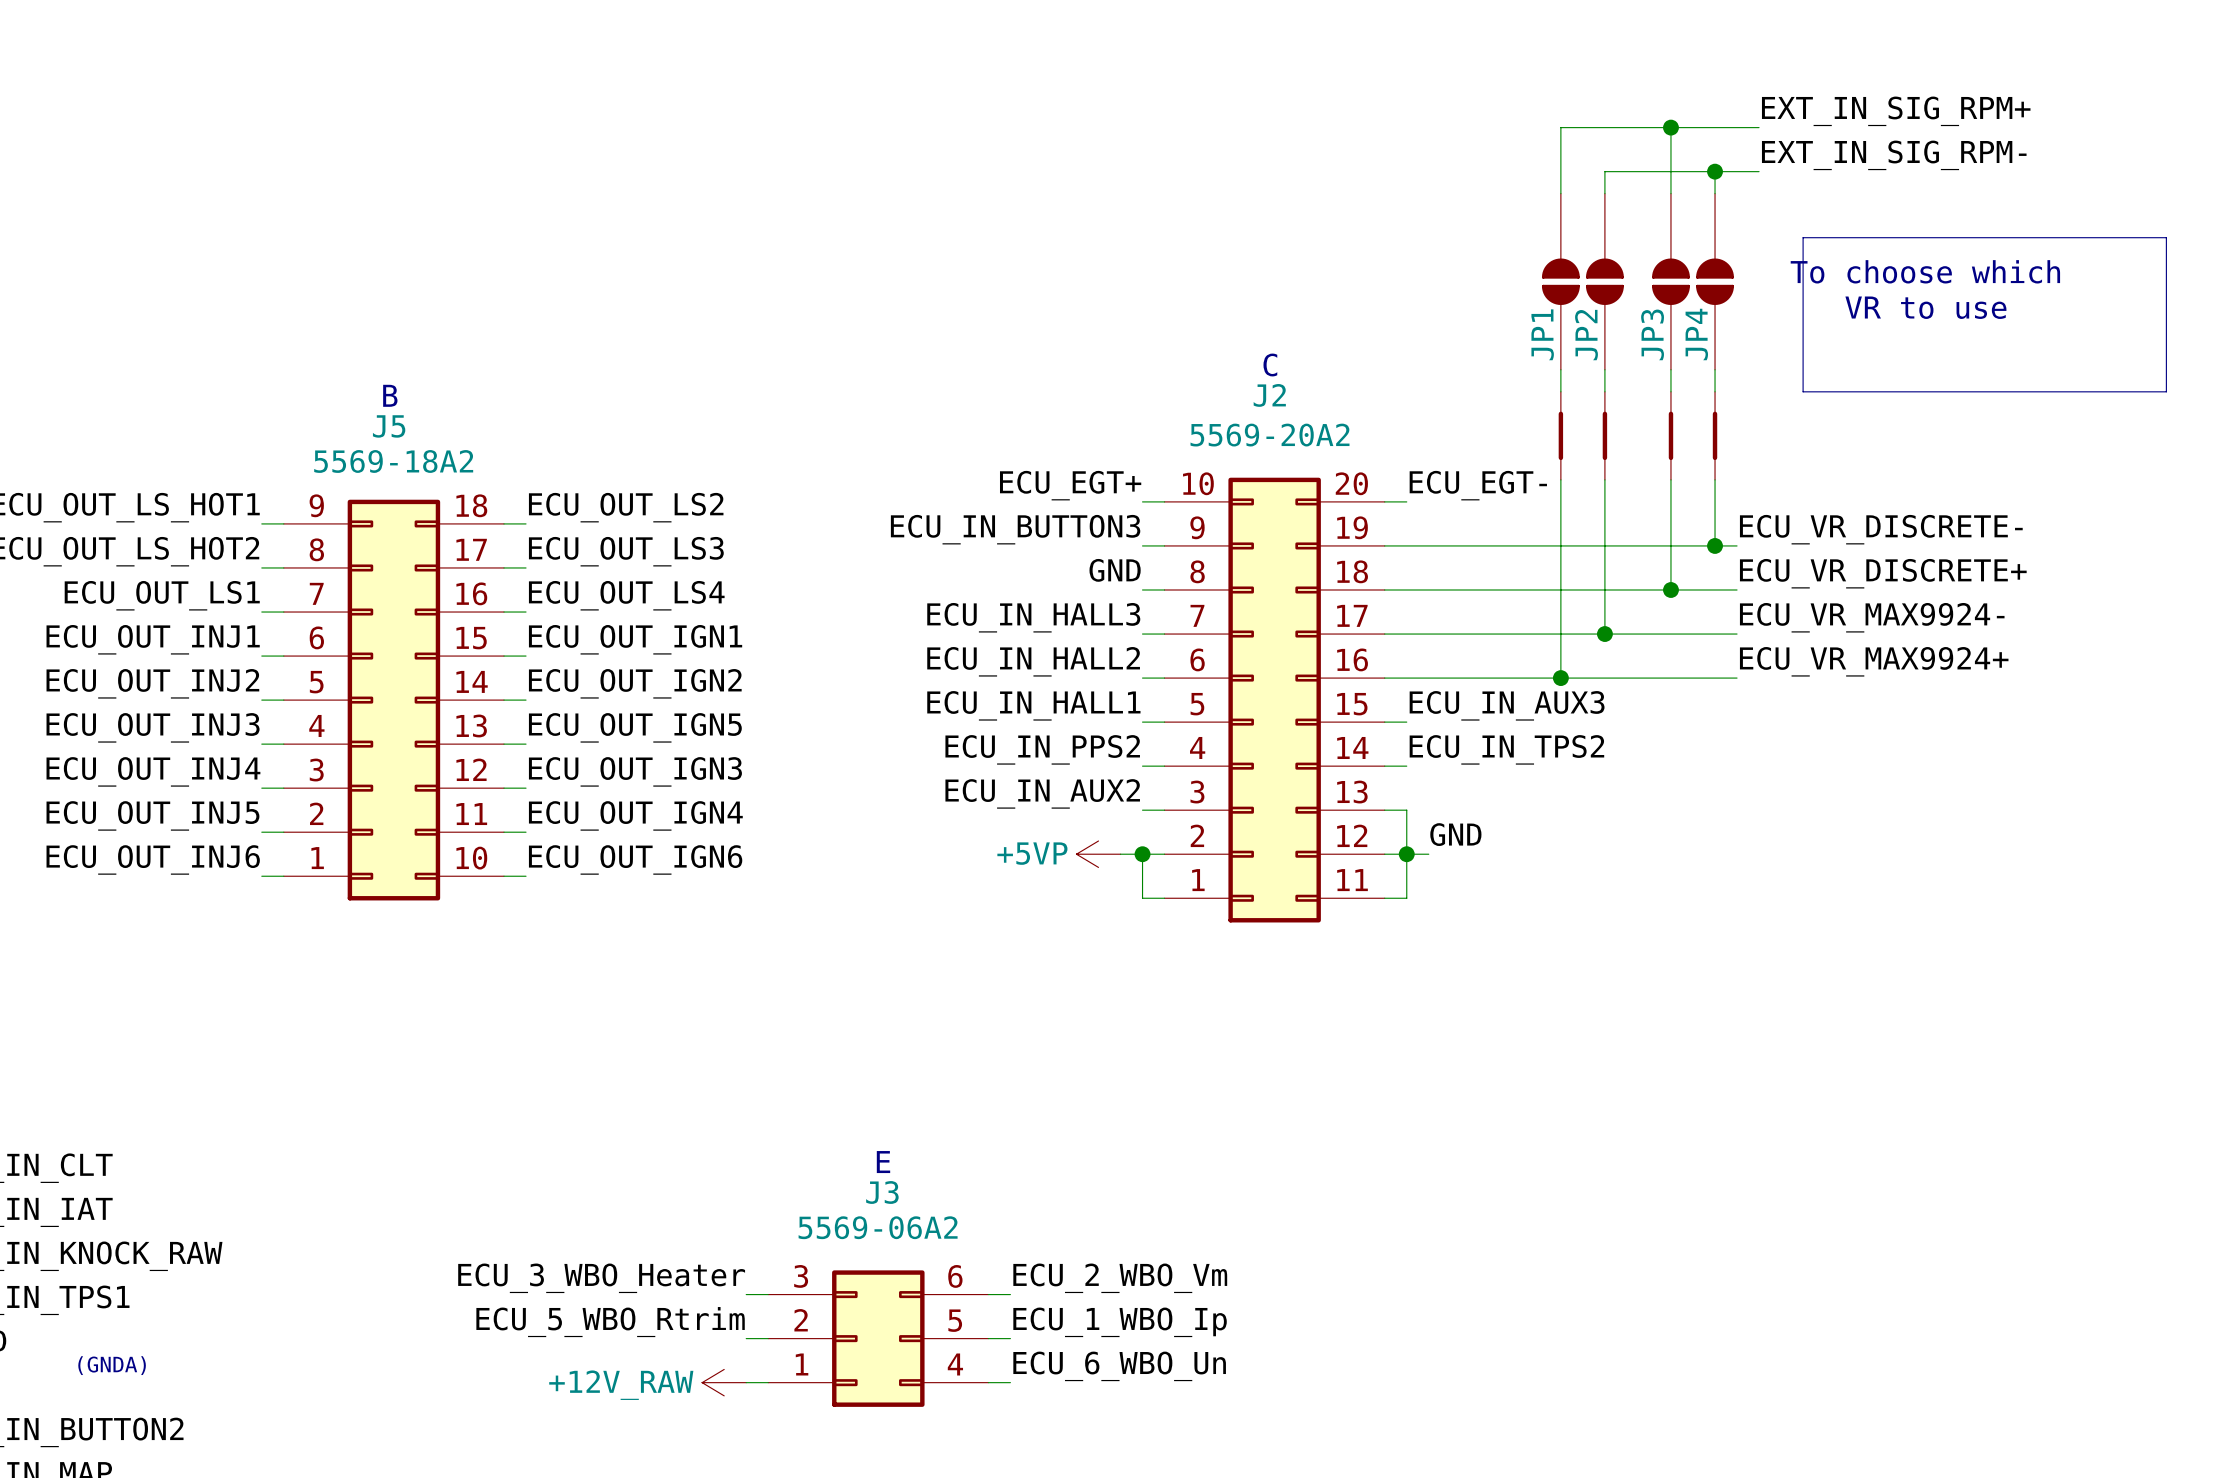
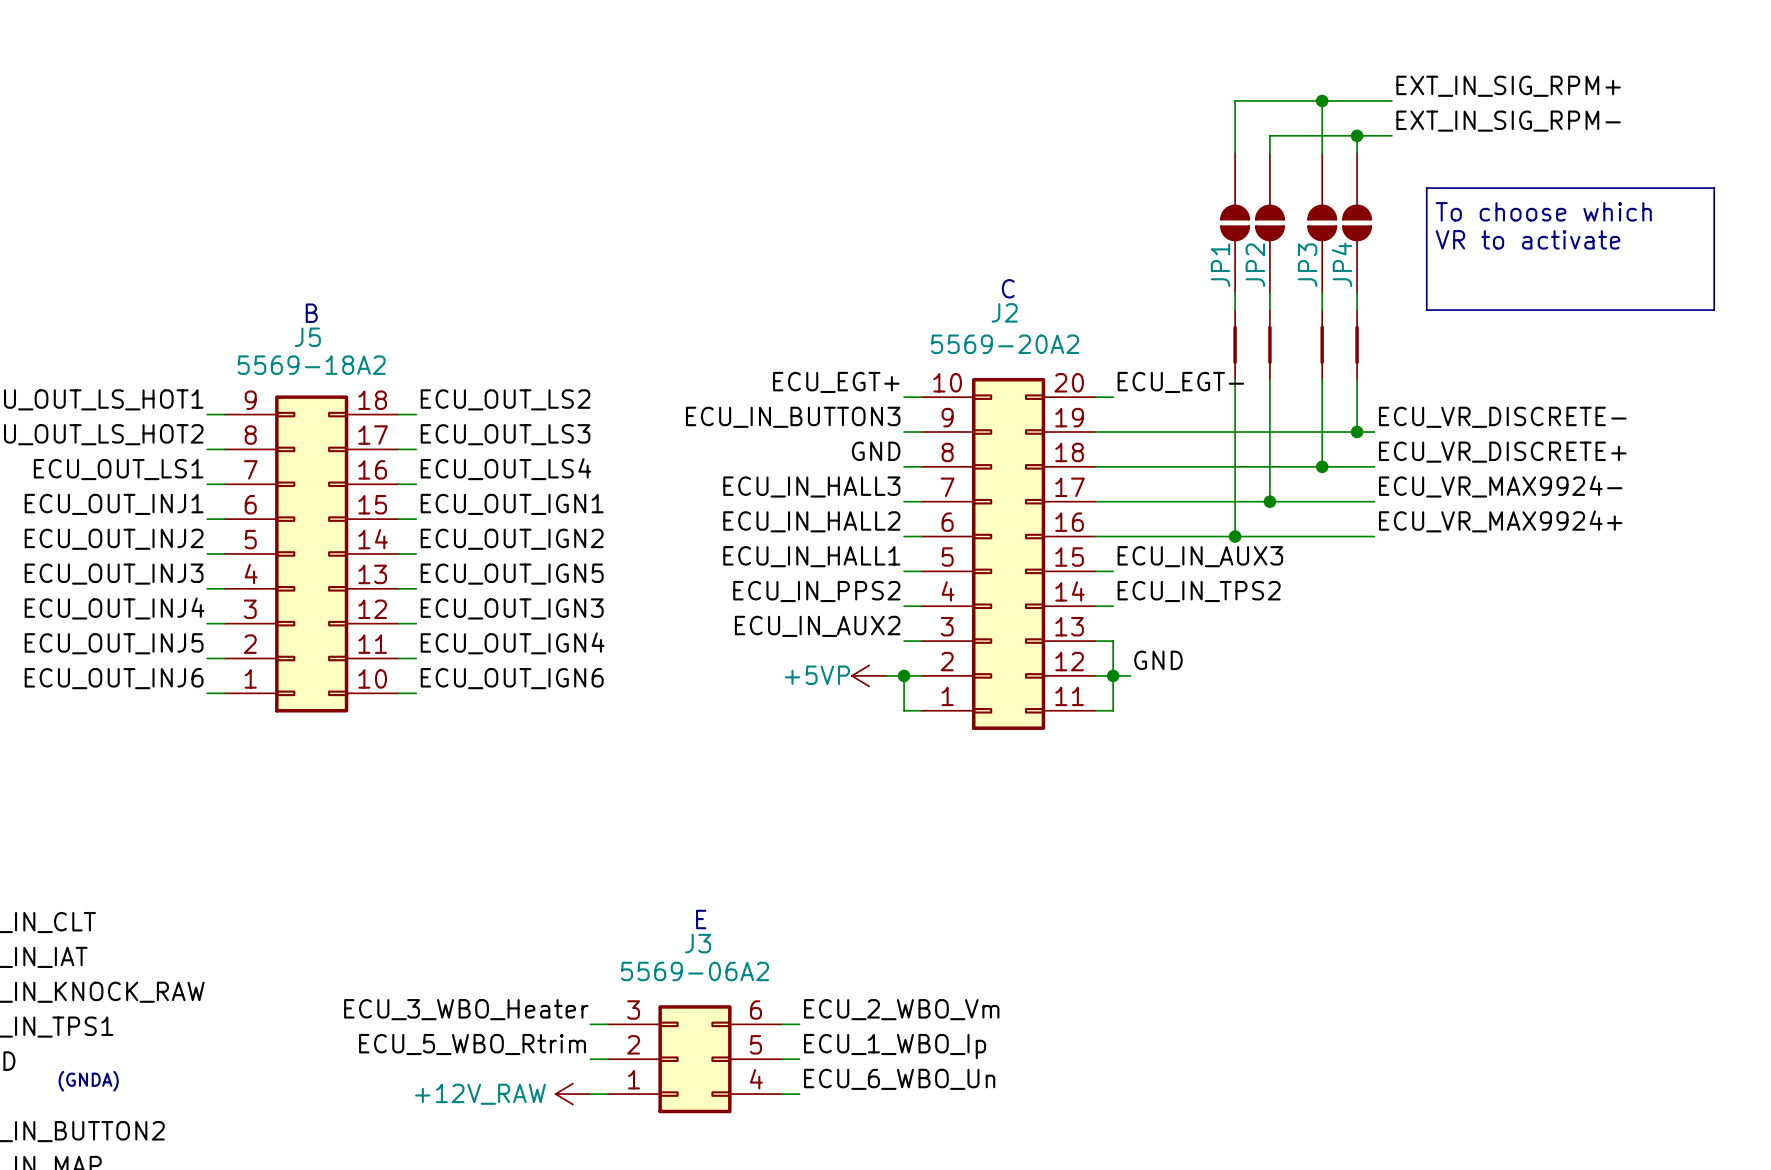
text position: To choose which (1925, 271) -> To choose which (1543, 211)
text: VR to use (1925, 307) -> VR to activate (1528, 239)

